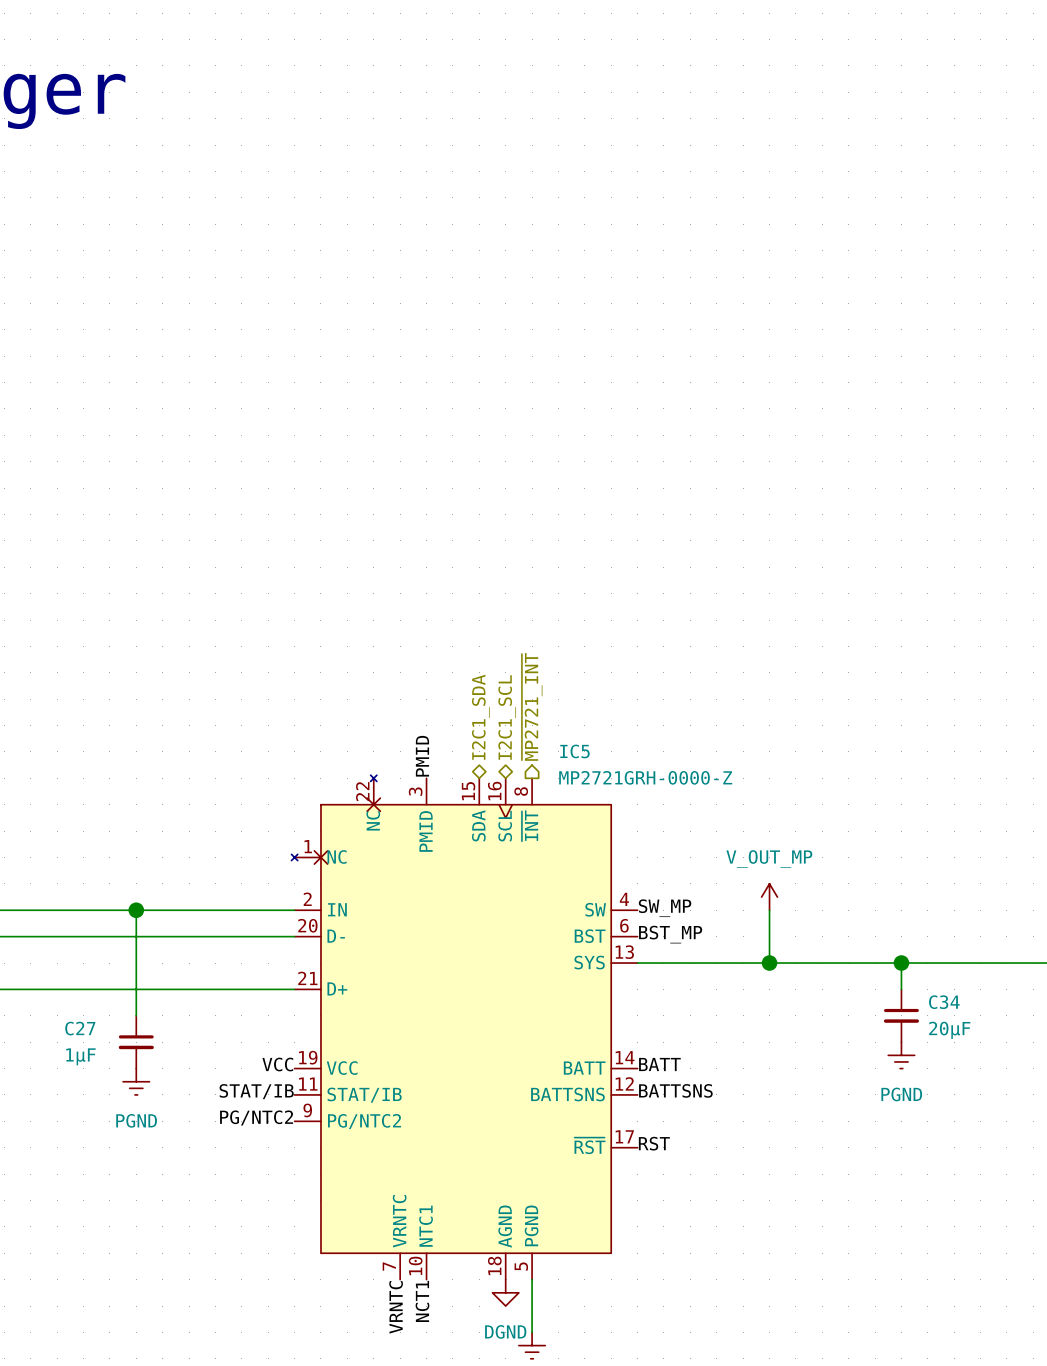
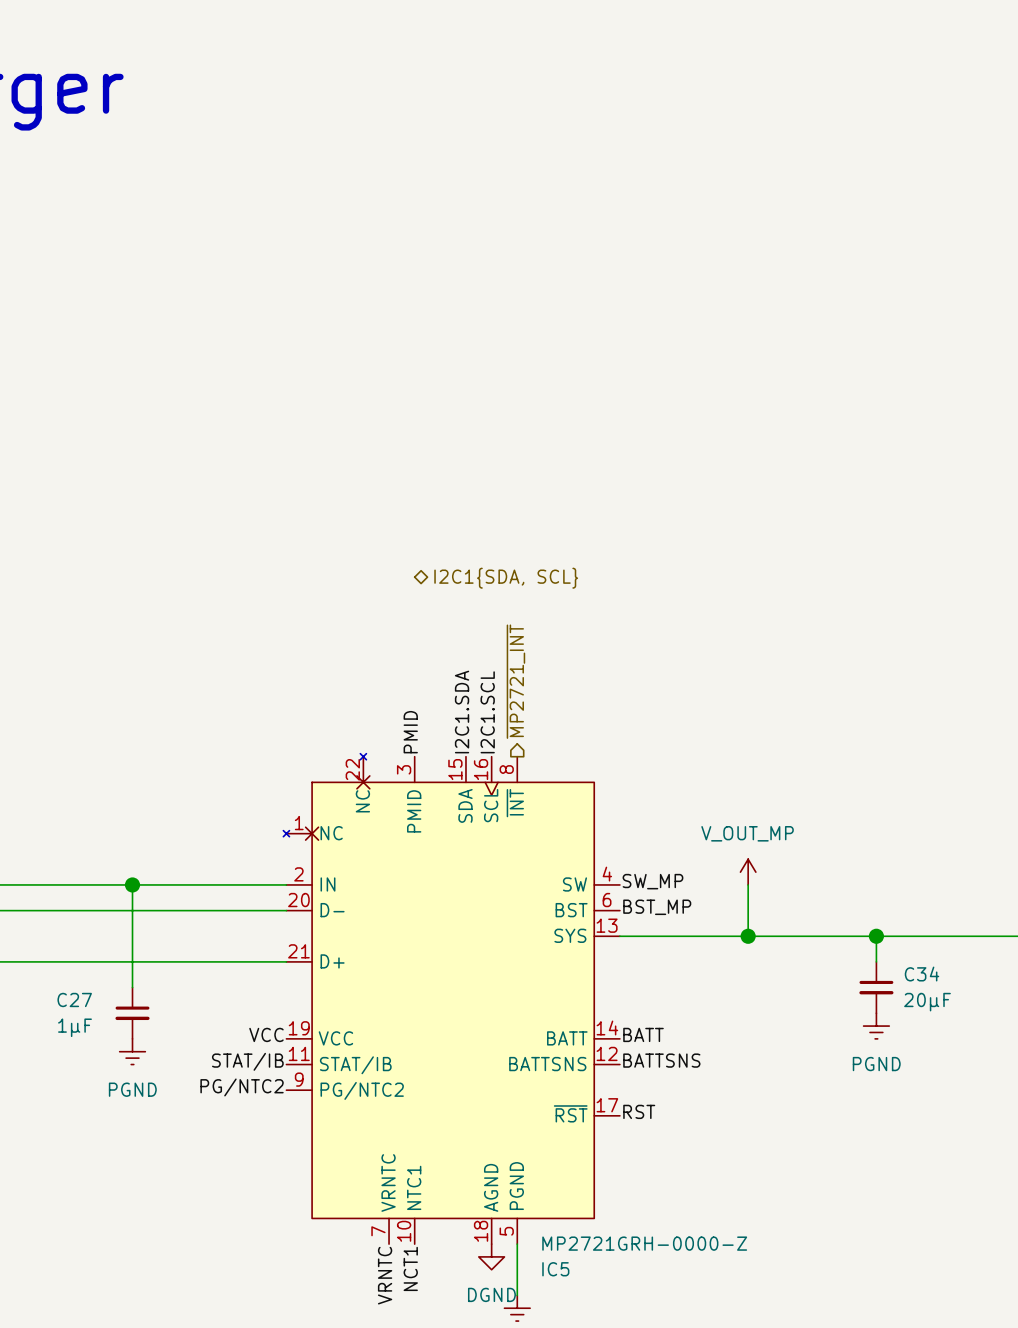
hierarchical label: none -> I2C1{SDA, SCL} (506, 578)
hierarchical label: I2C1_SDA (480, 717) -> none
hierarchical label: I2C1_SCL (507, 717) -> none
label: none -> I2C1.SDA (462, 712)
label: none -> I2C1.SCL (487, 712)
IC5 name position: IC5 (574, 751) -> IC5 (555, 1269)
IC5 value position: MP2721GRH-0000-Z (645, 777) -> MP2721GRH-0000-Z (644, 1243)

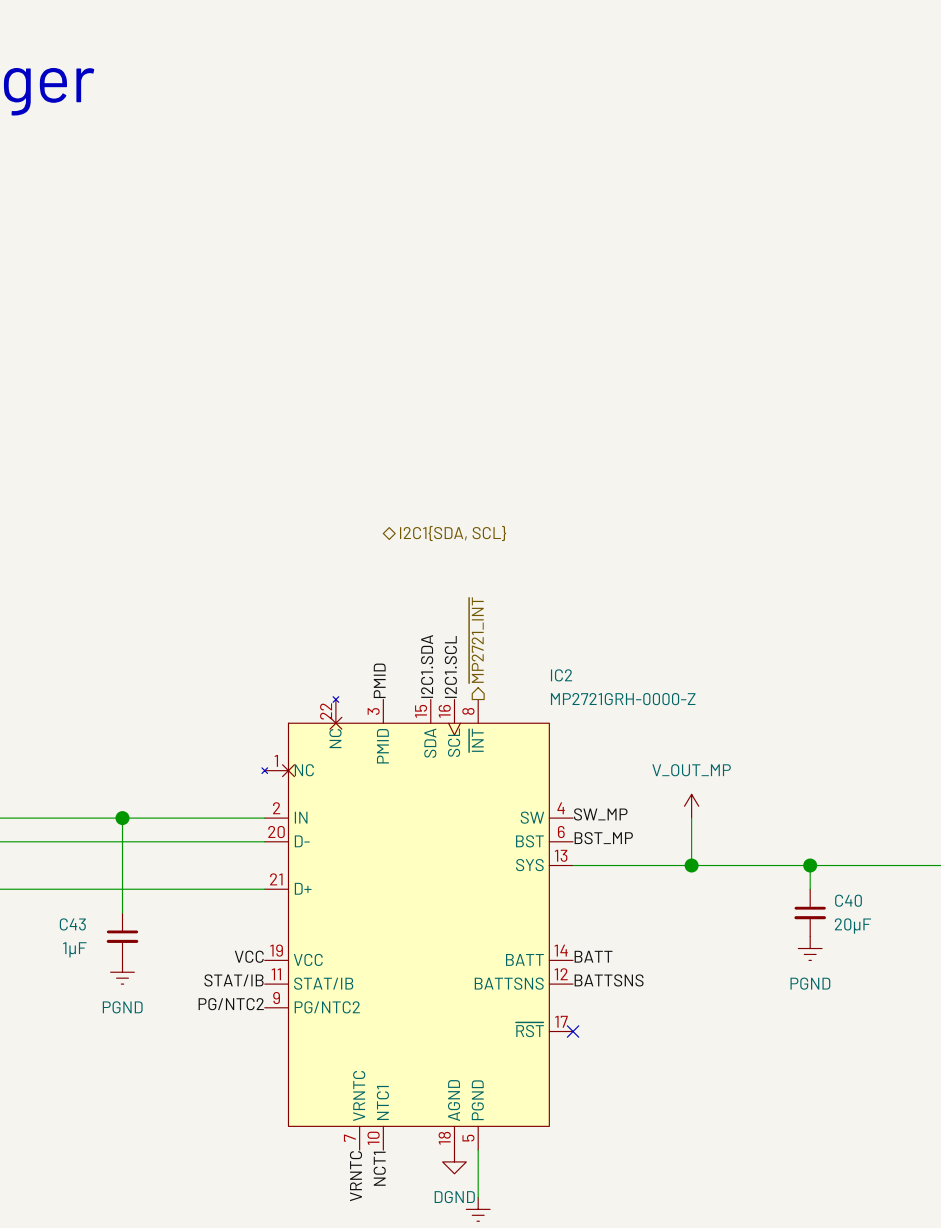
C34 name: C34 (922, 974) -> C40 (848, 900)
C27 name: C27 (74, 999) -> C43 (72, 924)
label: RST (639, 1111) -> none
no-connect mark: none -> (573, 1031)
IC5 value position: MP2721GRH-0000-Z (644, 1243) -> MP2721GRH-0000-Z (623, 699)
IC5 name: IC5 (555, 1269) -> IC2 (561, 675)

